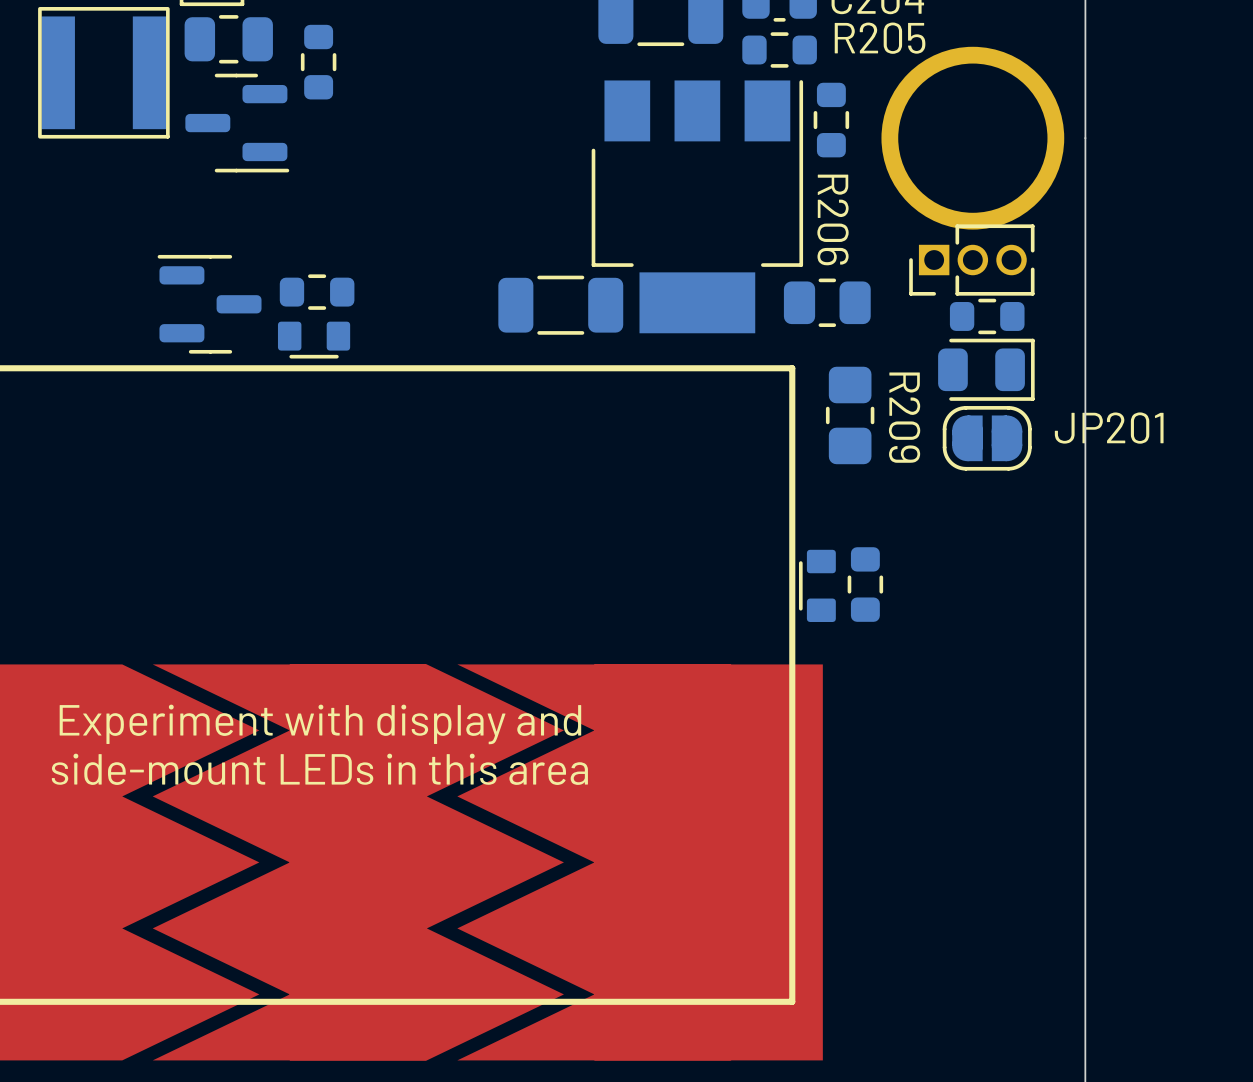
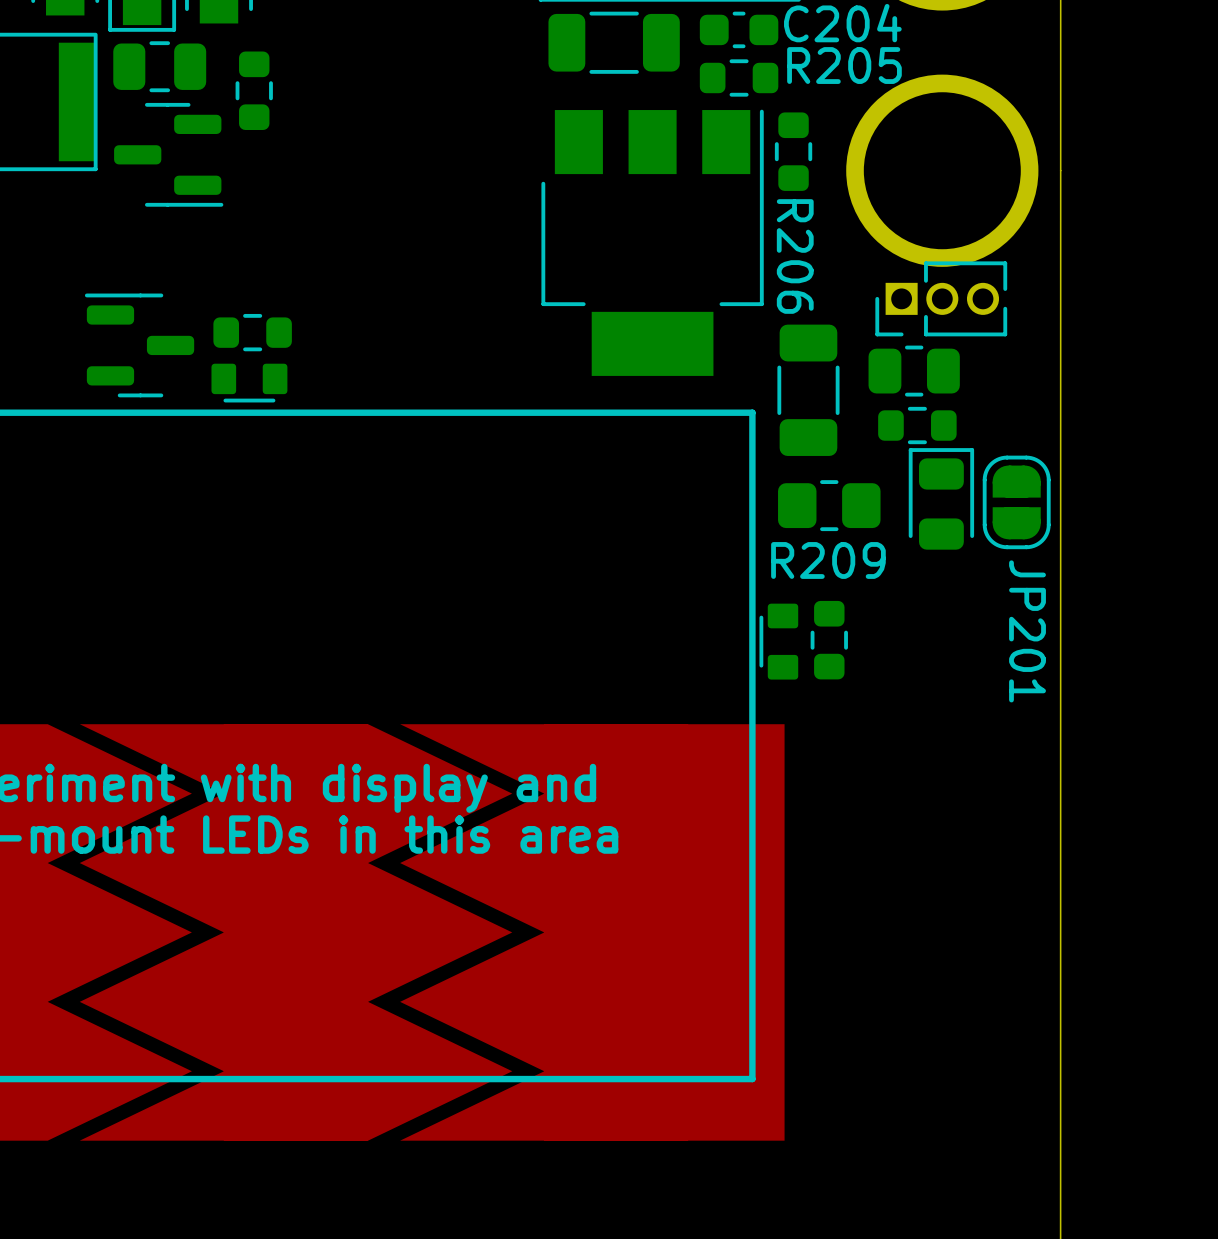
part position: (827, 302) -> (914, 371)
part rotation: 0° (560, 305) -> 90° clockwise (808, 390)
part position: (560, 305) -> (808, 390)
part position: (987, 316) -> (917, 425)
part rotation: 0° (986, 369) -> 90° counterclockwise (941, 498)
part position: (986, 369) -> (941, 498)
R209 rotation: 0° (850, 415) -> 90° clockwise (829, 505)
JP201 rotation: 0° (987, 438) -> 90° clockwise (1016, 502)
JP201 position: (987, 438) -> (1016, 502)

